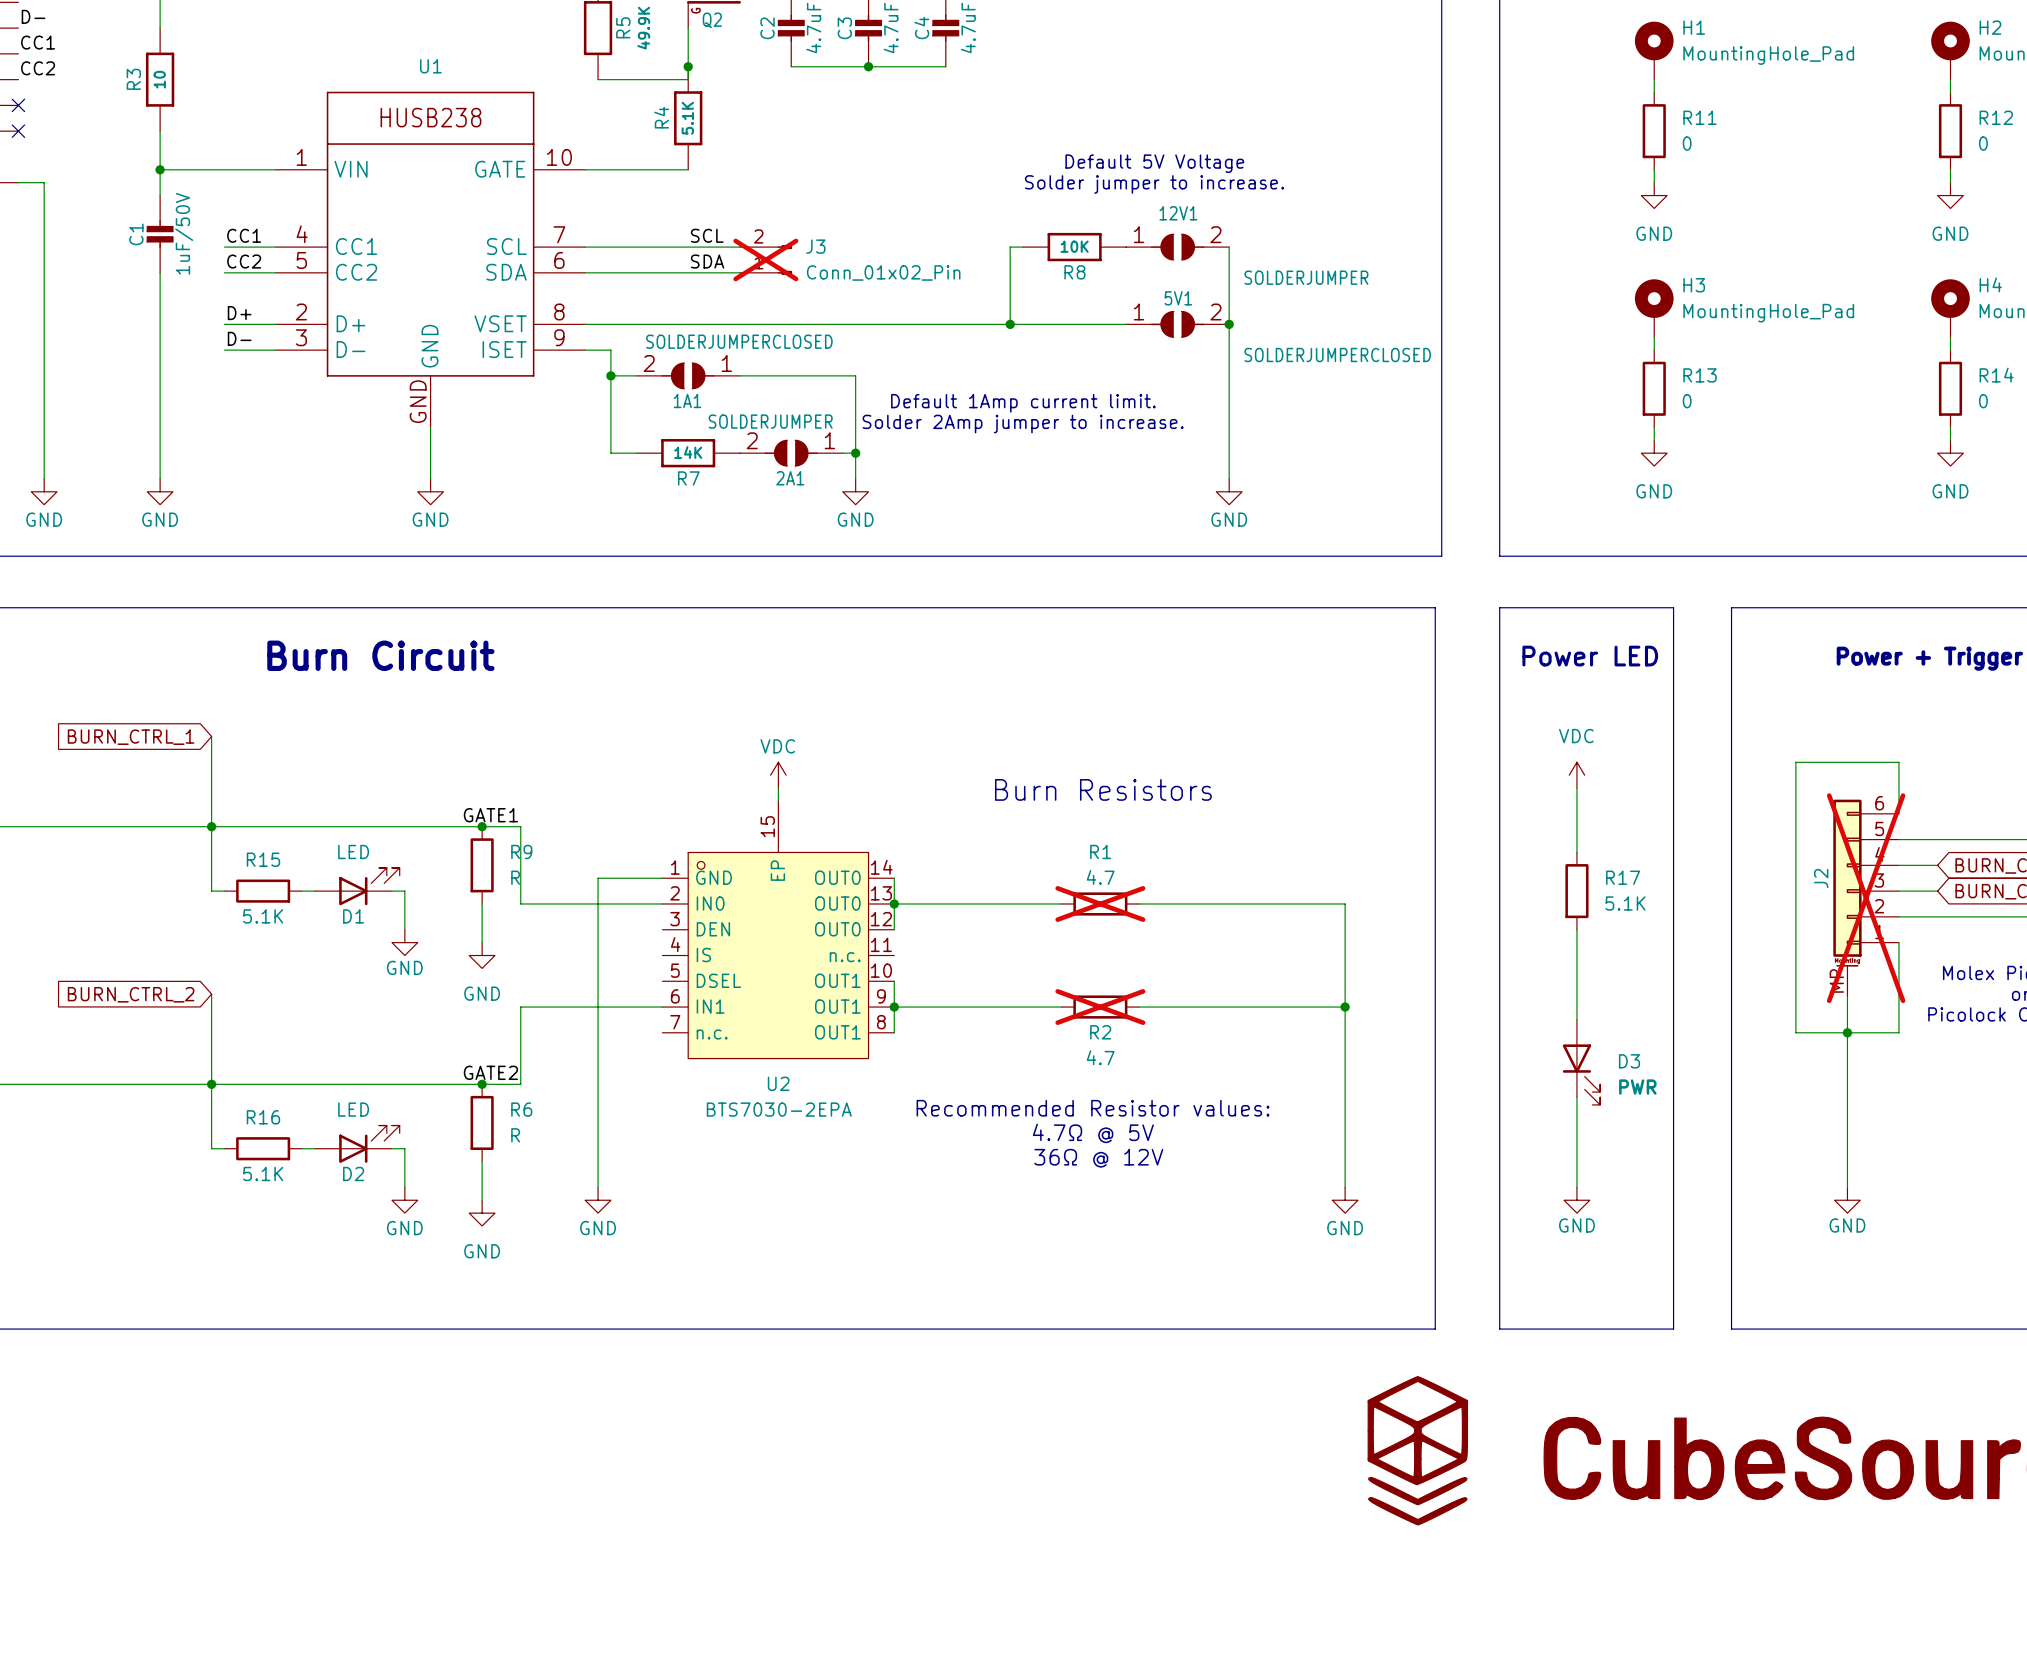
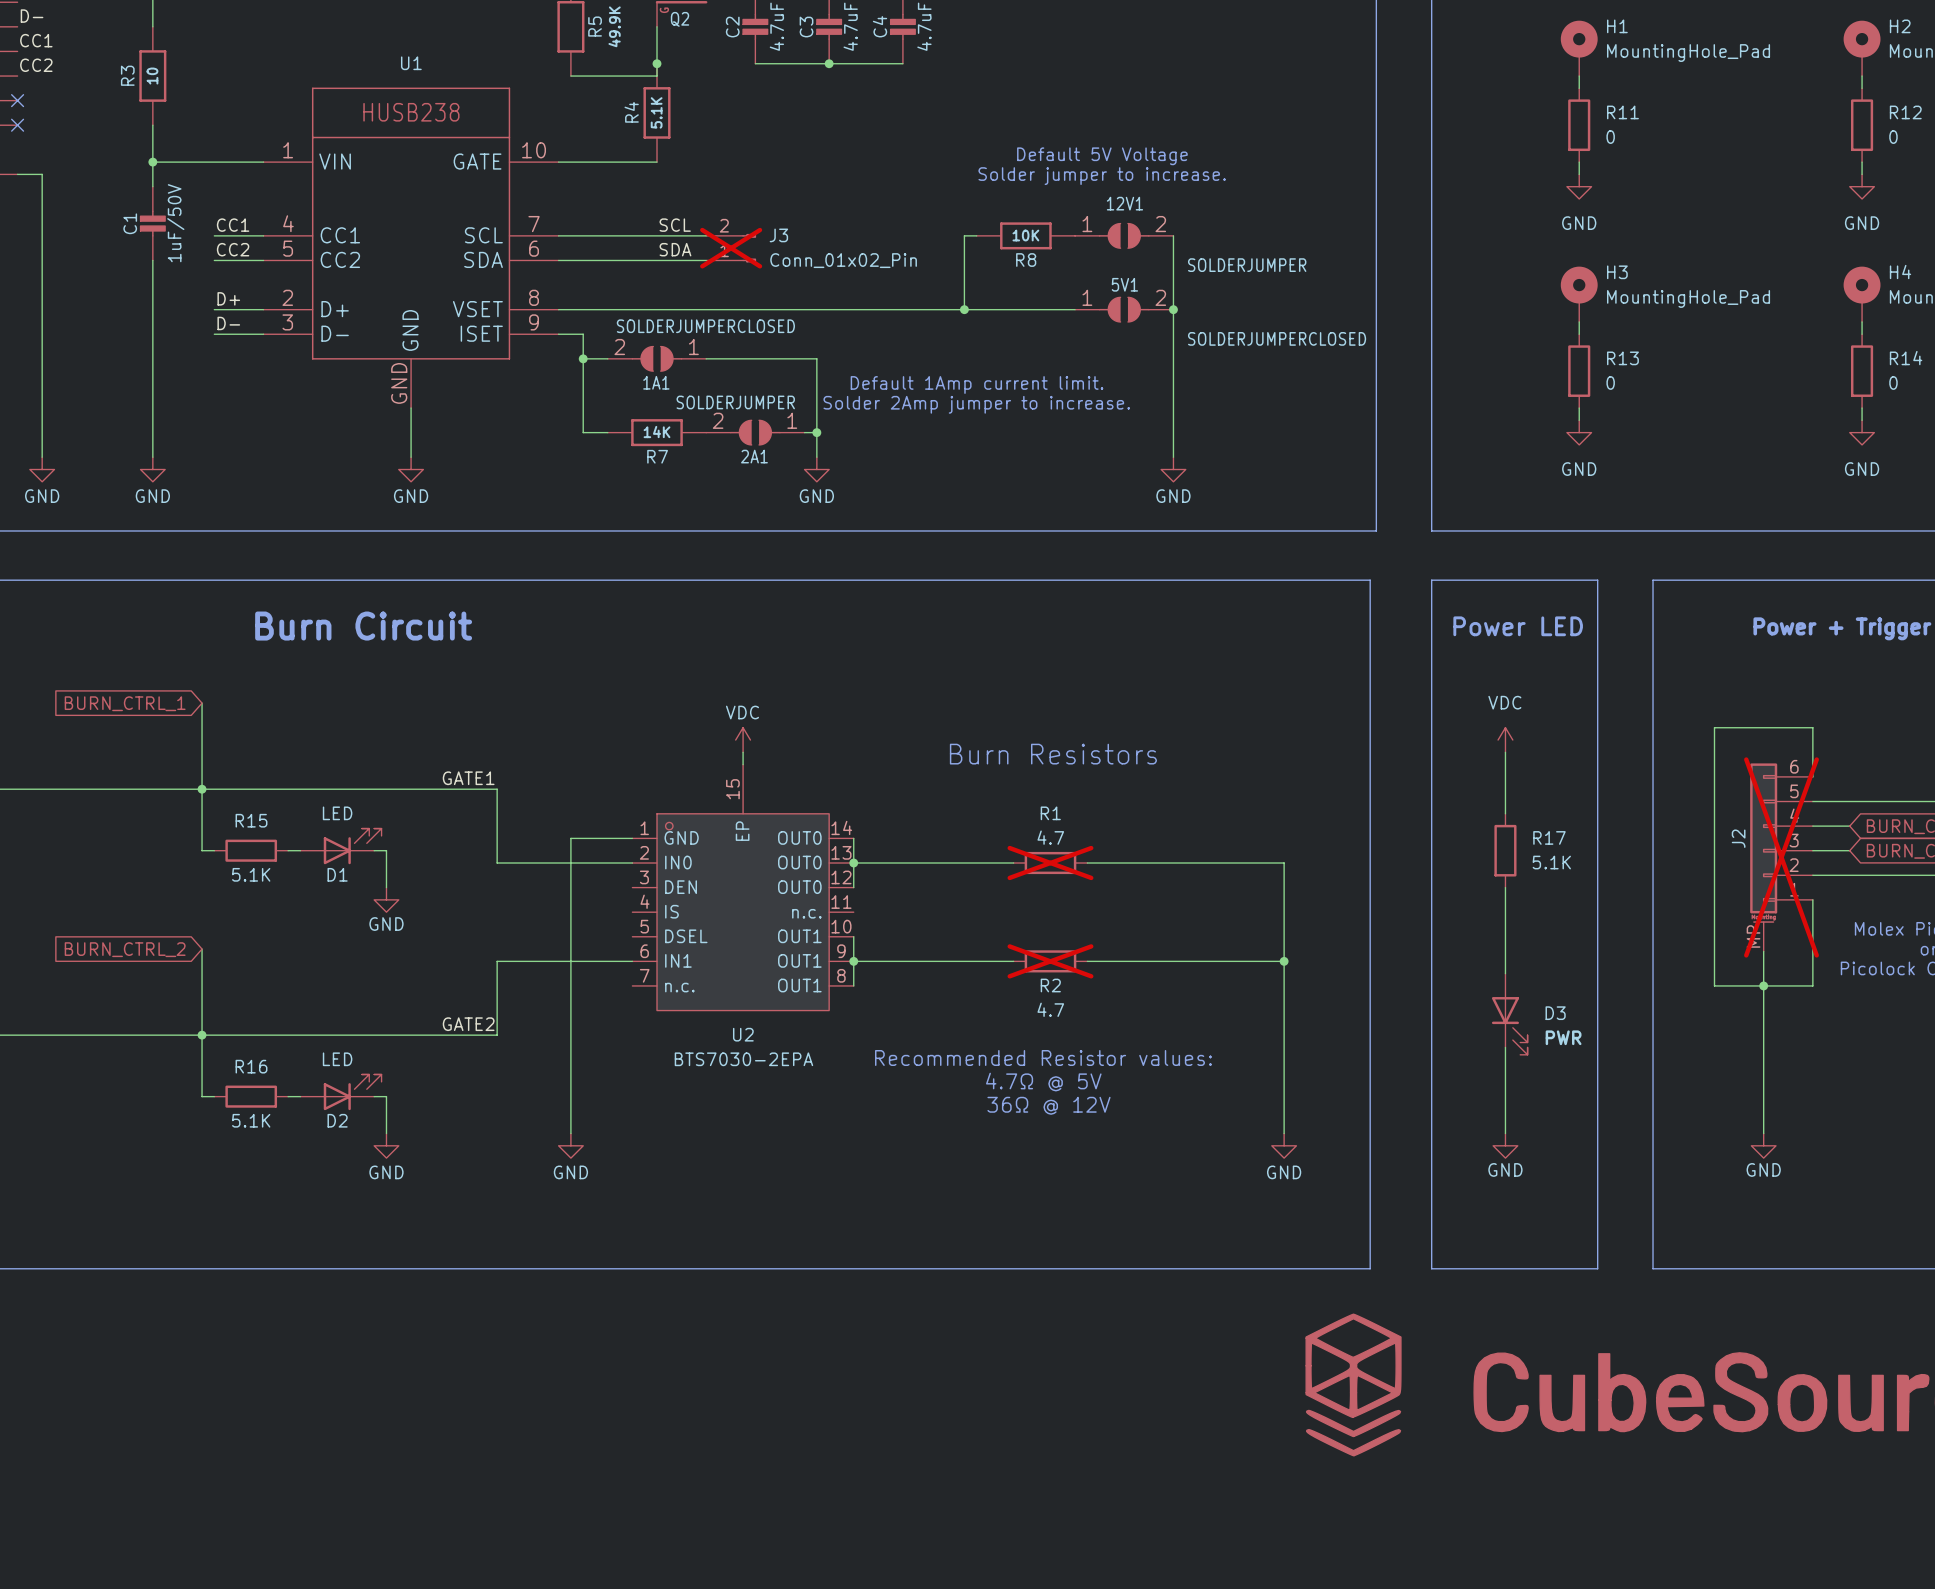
junction: (482, 826) -> none
R9: R (482, 865) -> none
wire: (482, 903) (482, 942) -> none
power symbol: GND (482, 955) -> none
junction: (482, 1084) -> none
R6: R (482, 1122) -> none
wire: (482, 1161) (482, 1200) -> none
power symbol: GND (482, 1213) -> none

